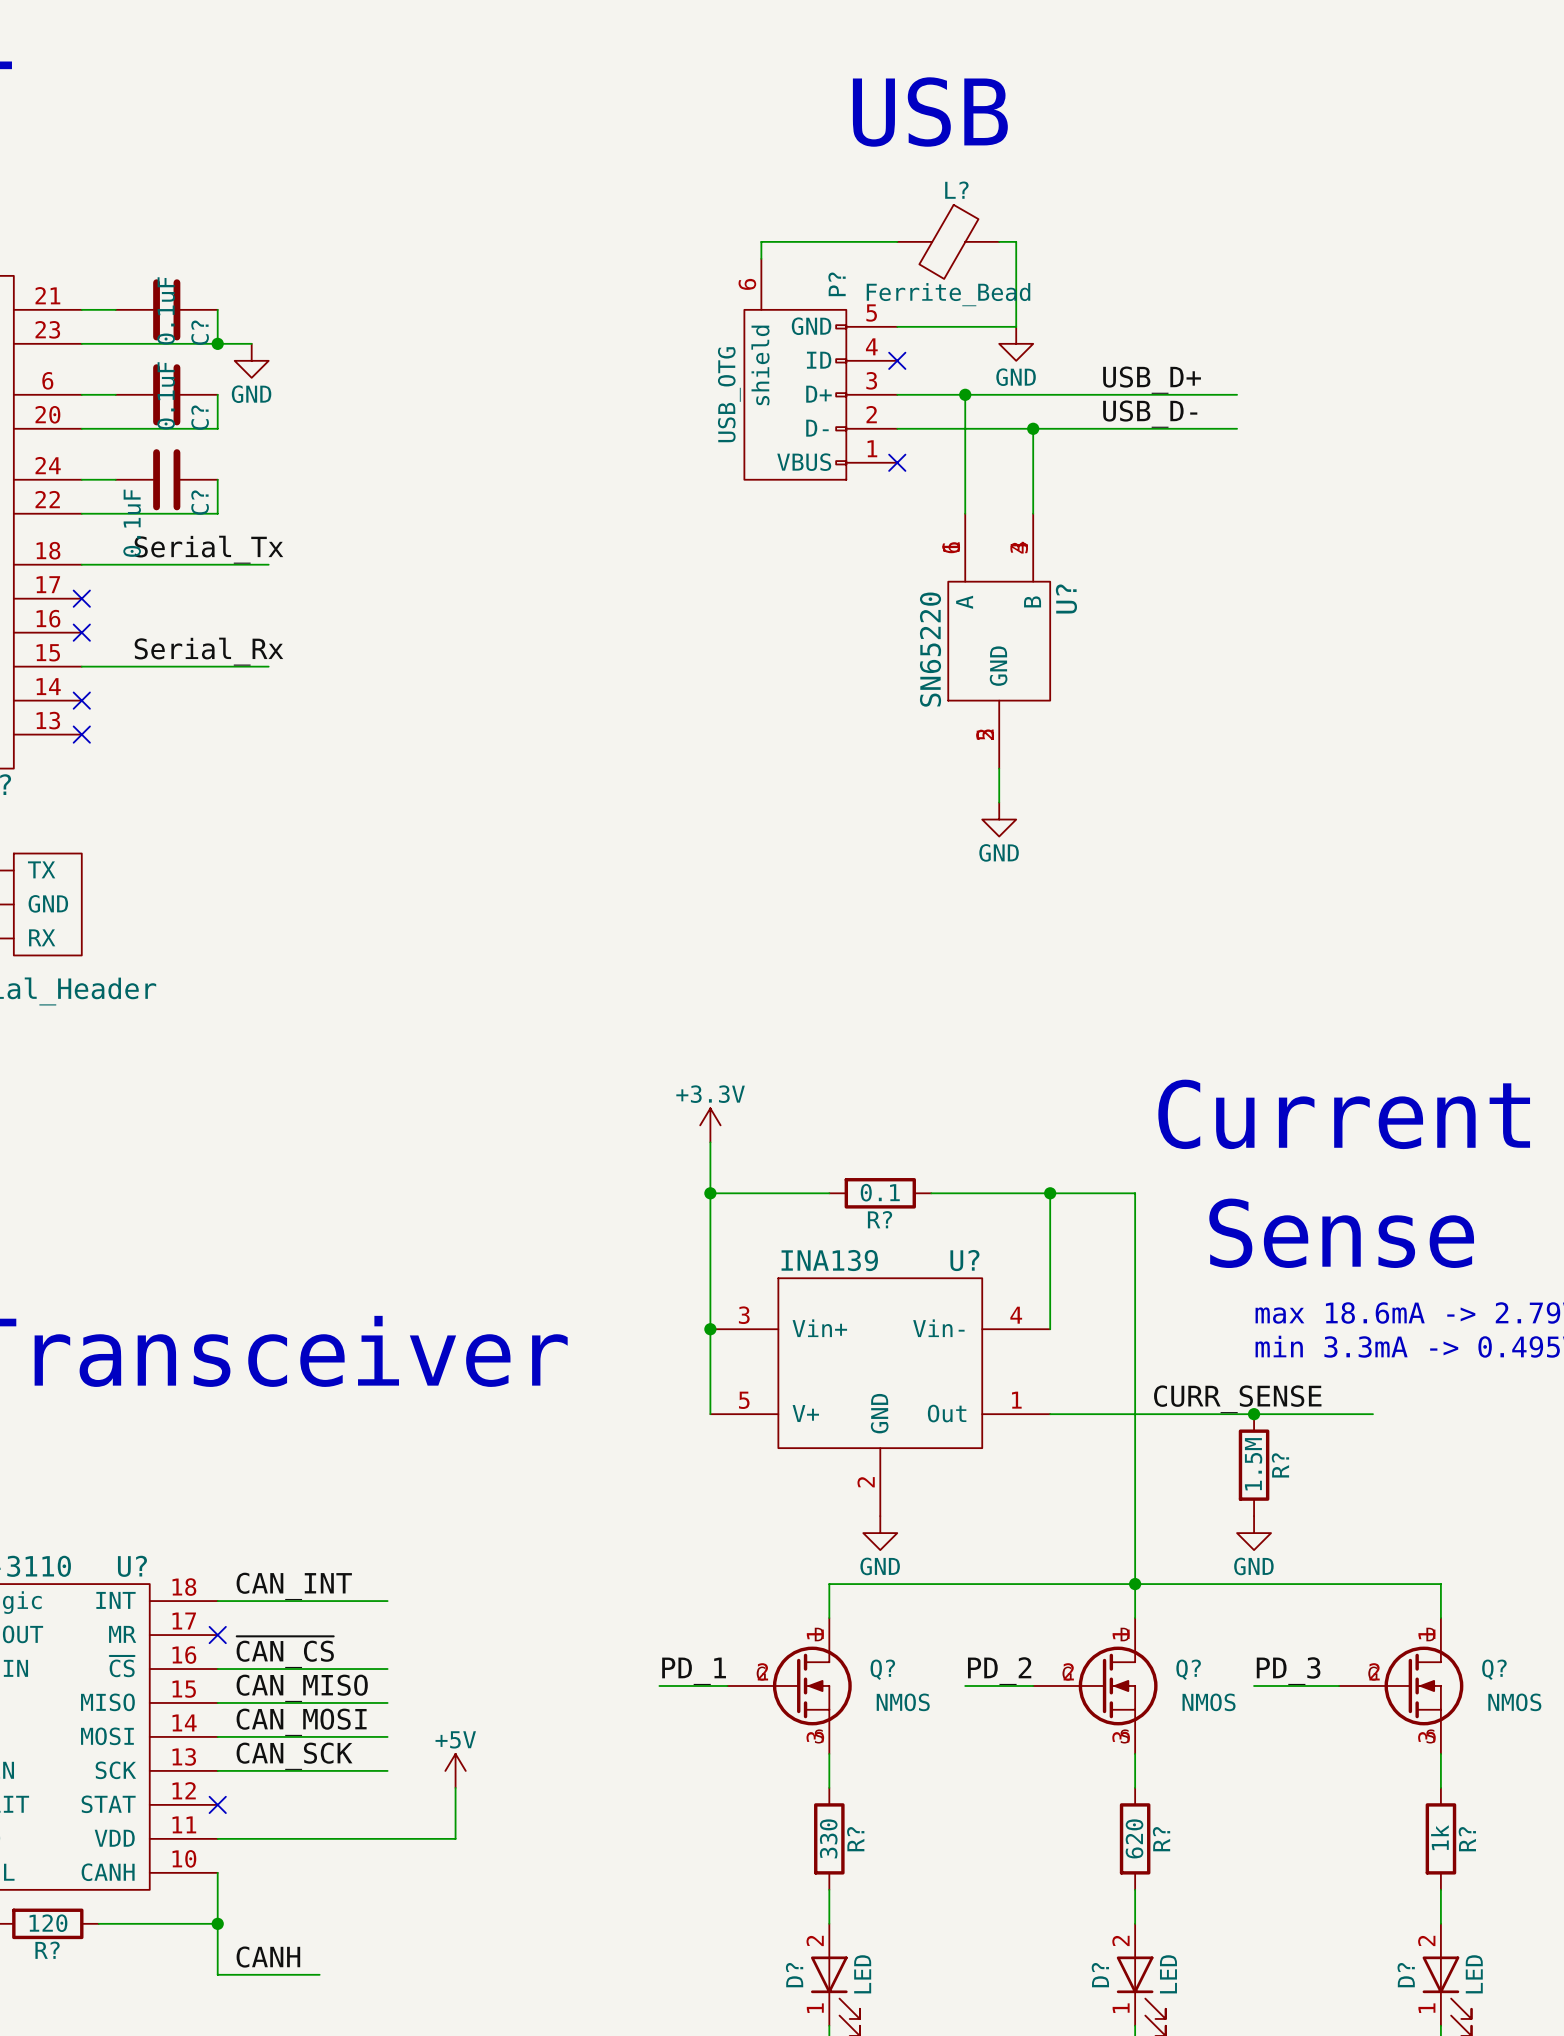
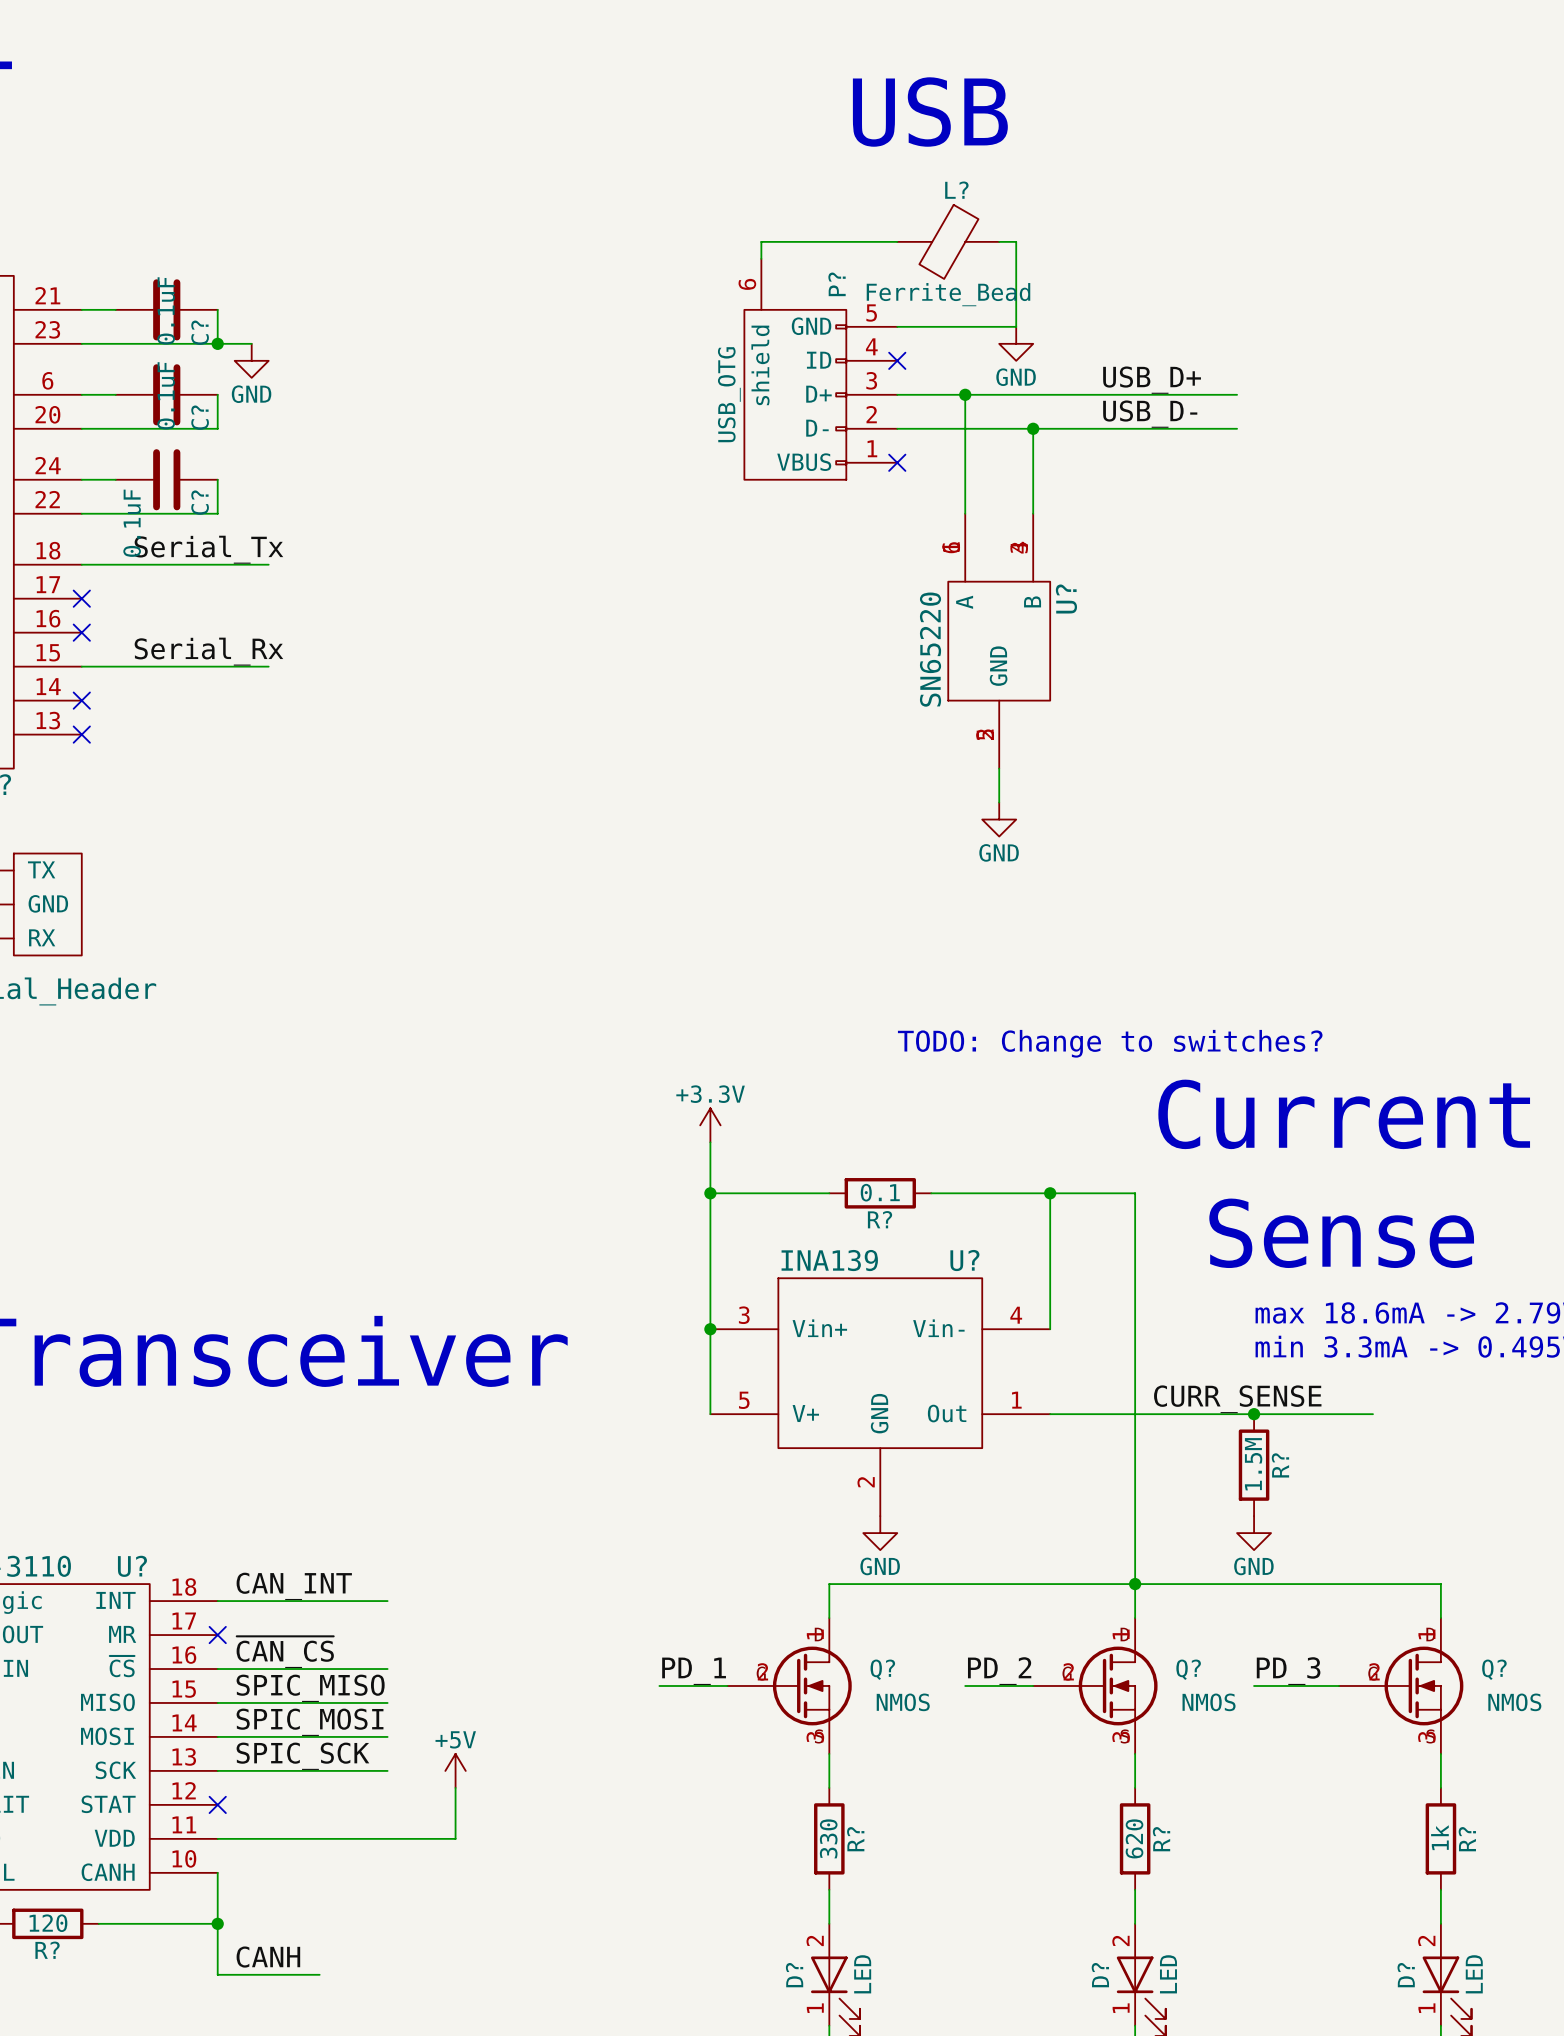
text: none -> TODO: Change to switches? (1110, 1043)
label: CAN_MISO (302, 1688) -> SPIC_MISO (310, 1688)
label: CAN_MOSI (301, 1722) -> SPIC_MOSI (310, 1722)
label: CAN_SCK (294, 1756) -> SPIC_SCK (302, 1756)

